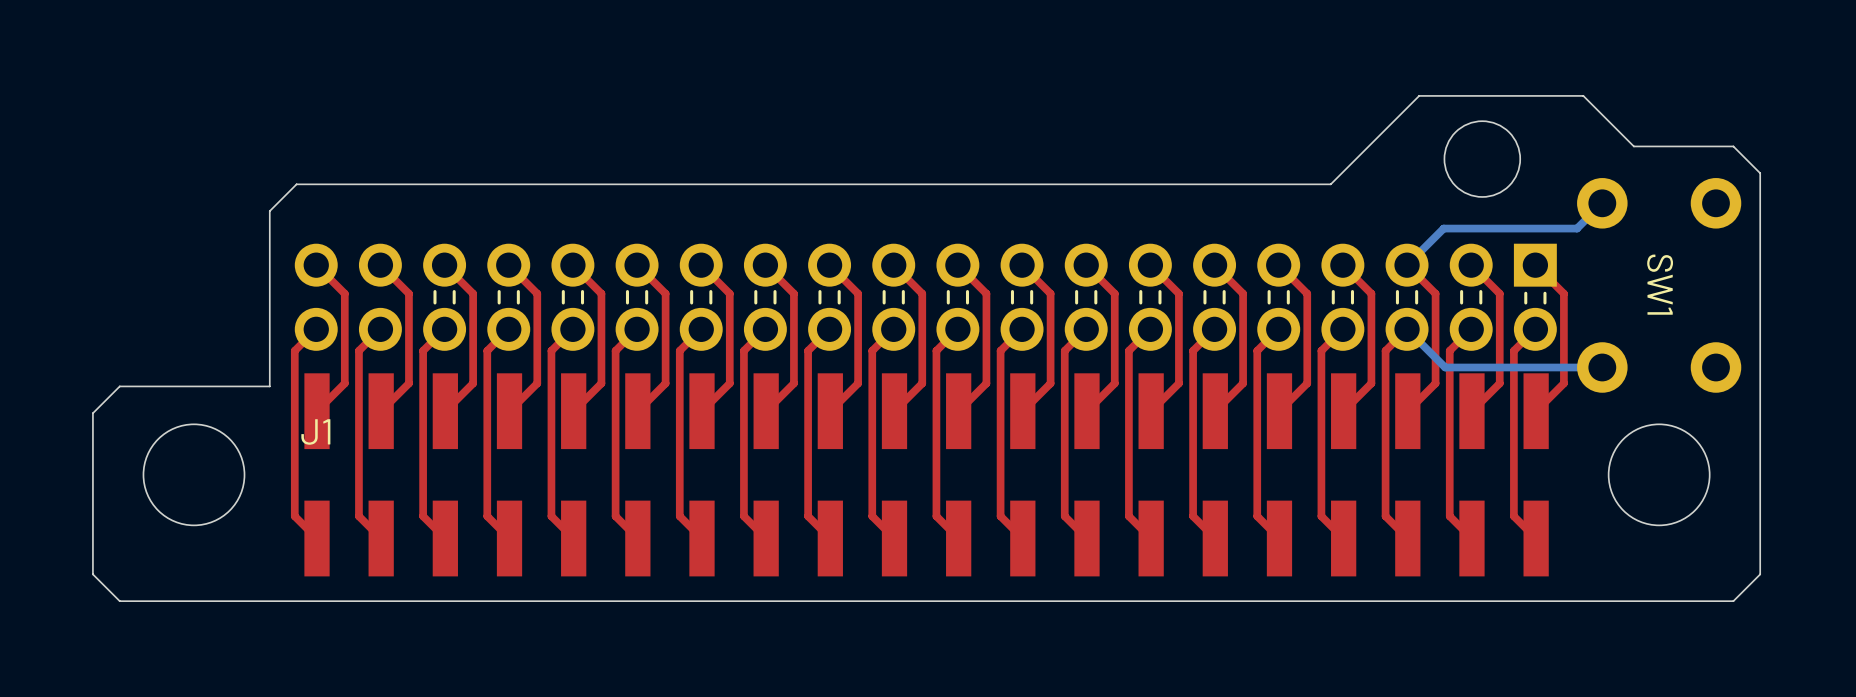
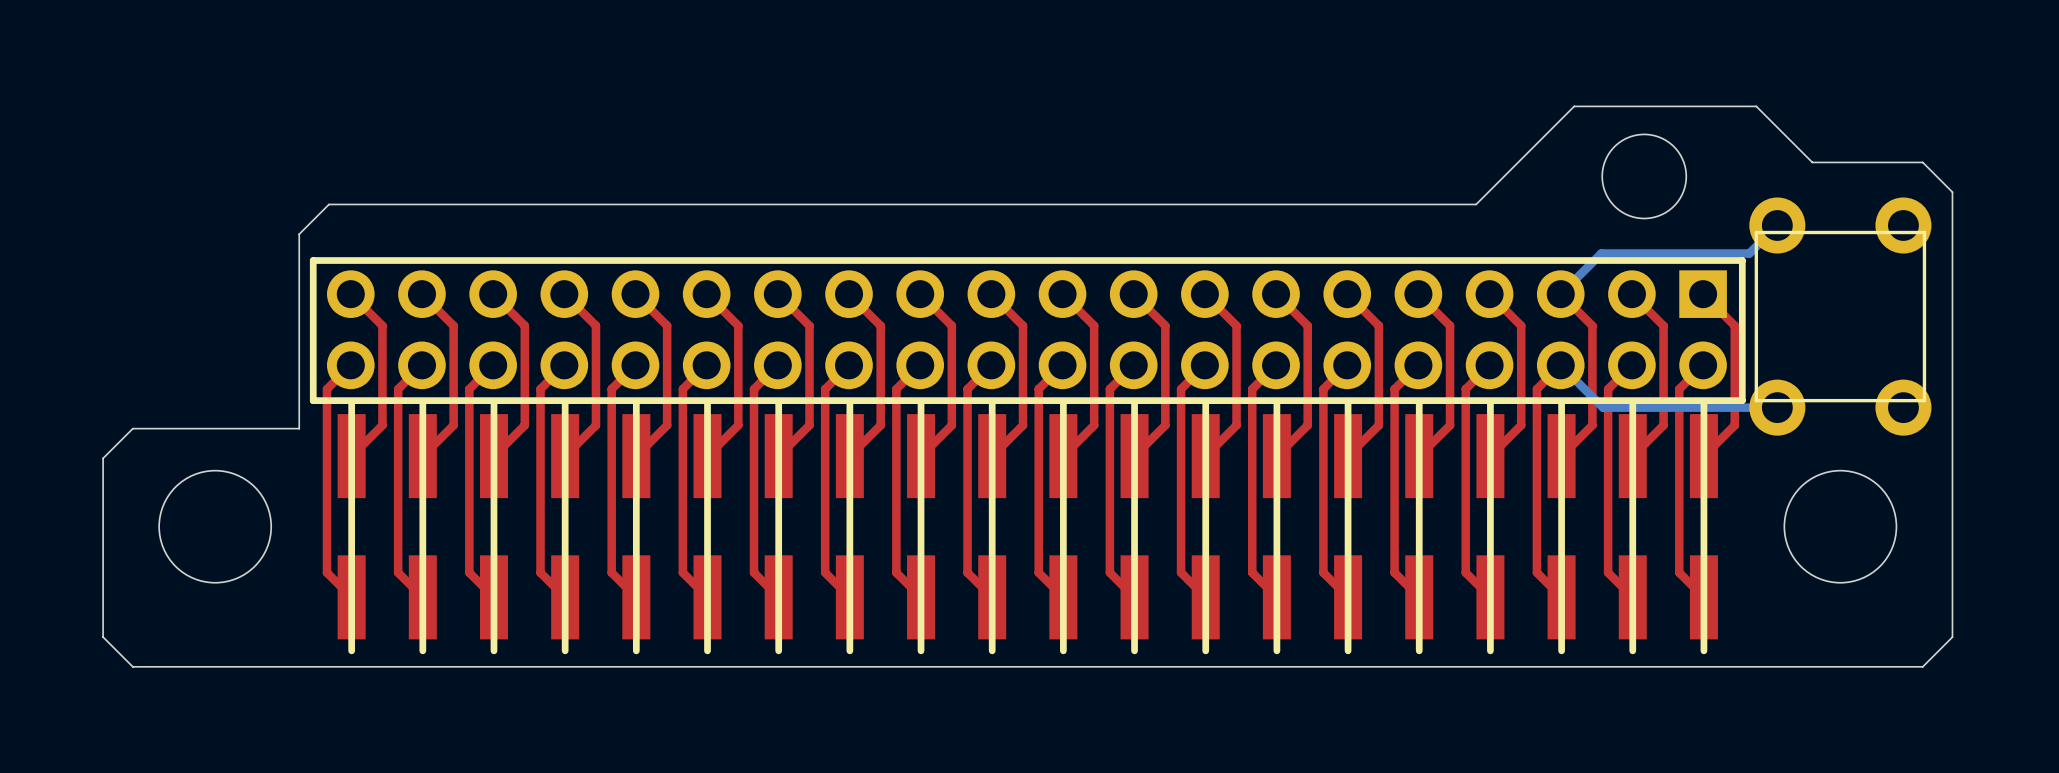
SW1: (1659, 285) -> none
part: none -> (1840, 316)
J1: (925, 297) -> none
part: none -> (1027, 455)

